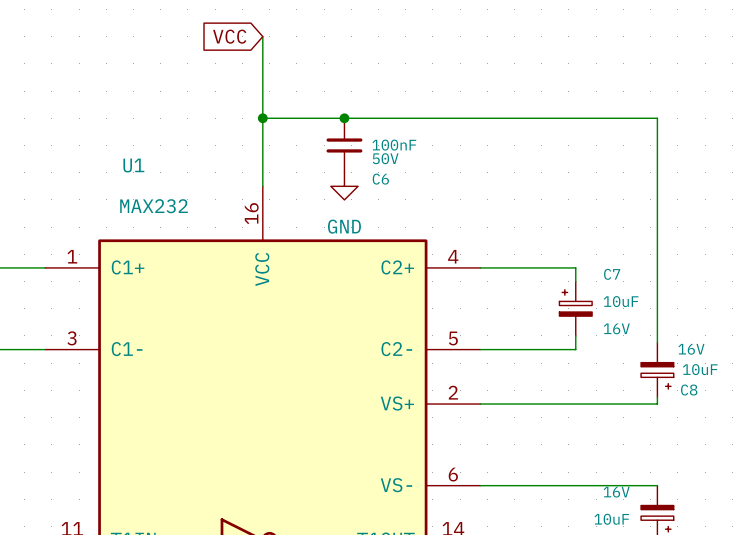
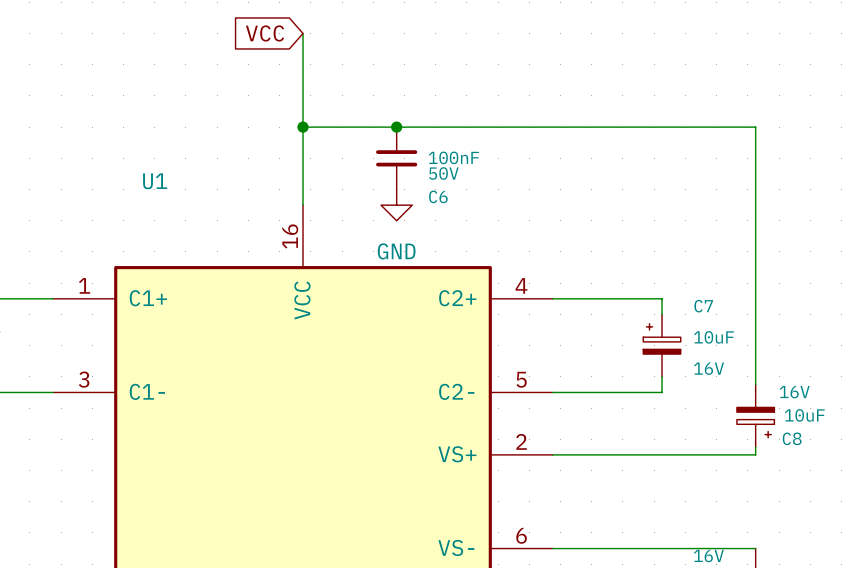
U1 value: MAX232 (154, 206) -> none

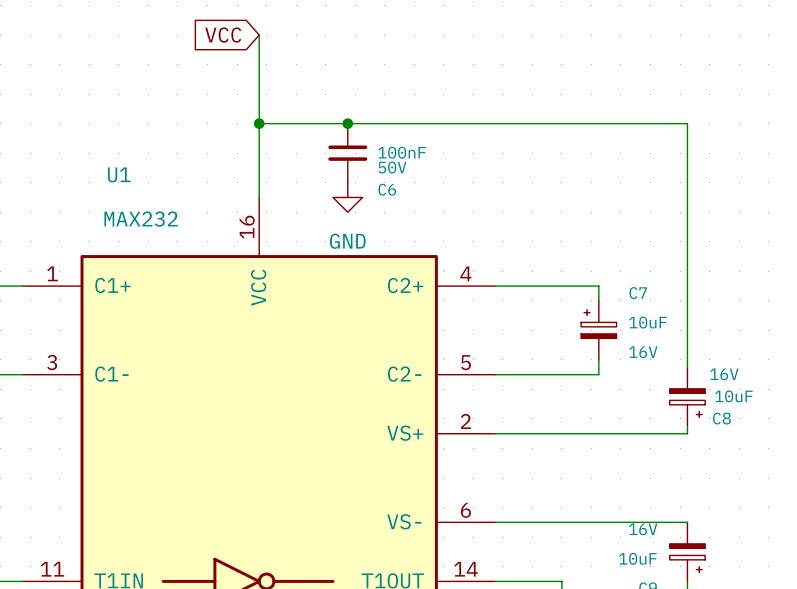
U1 value: none -> MAX232 (141, 219)

